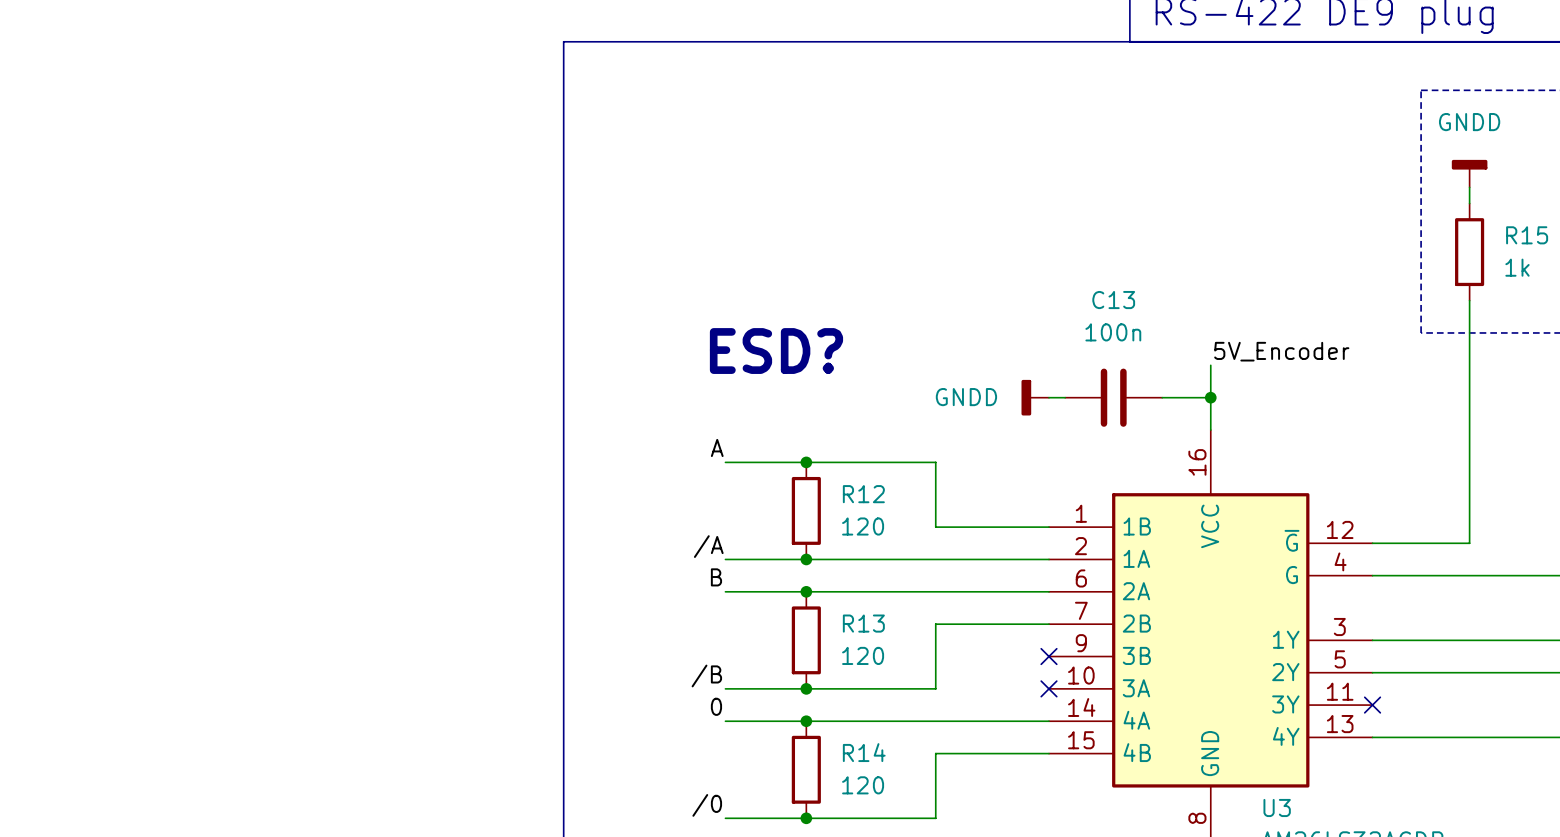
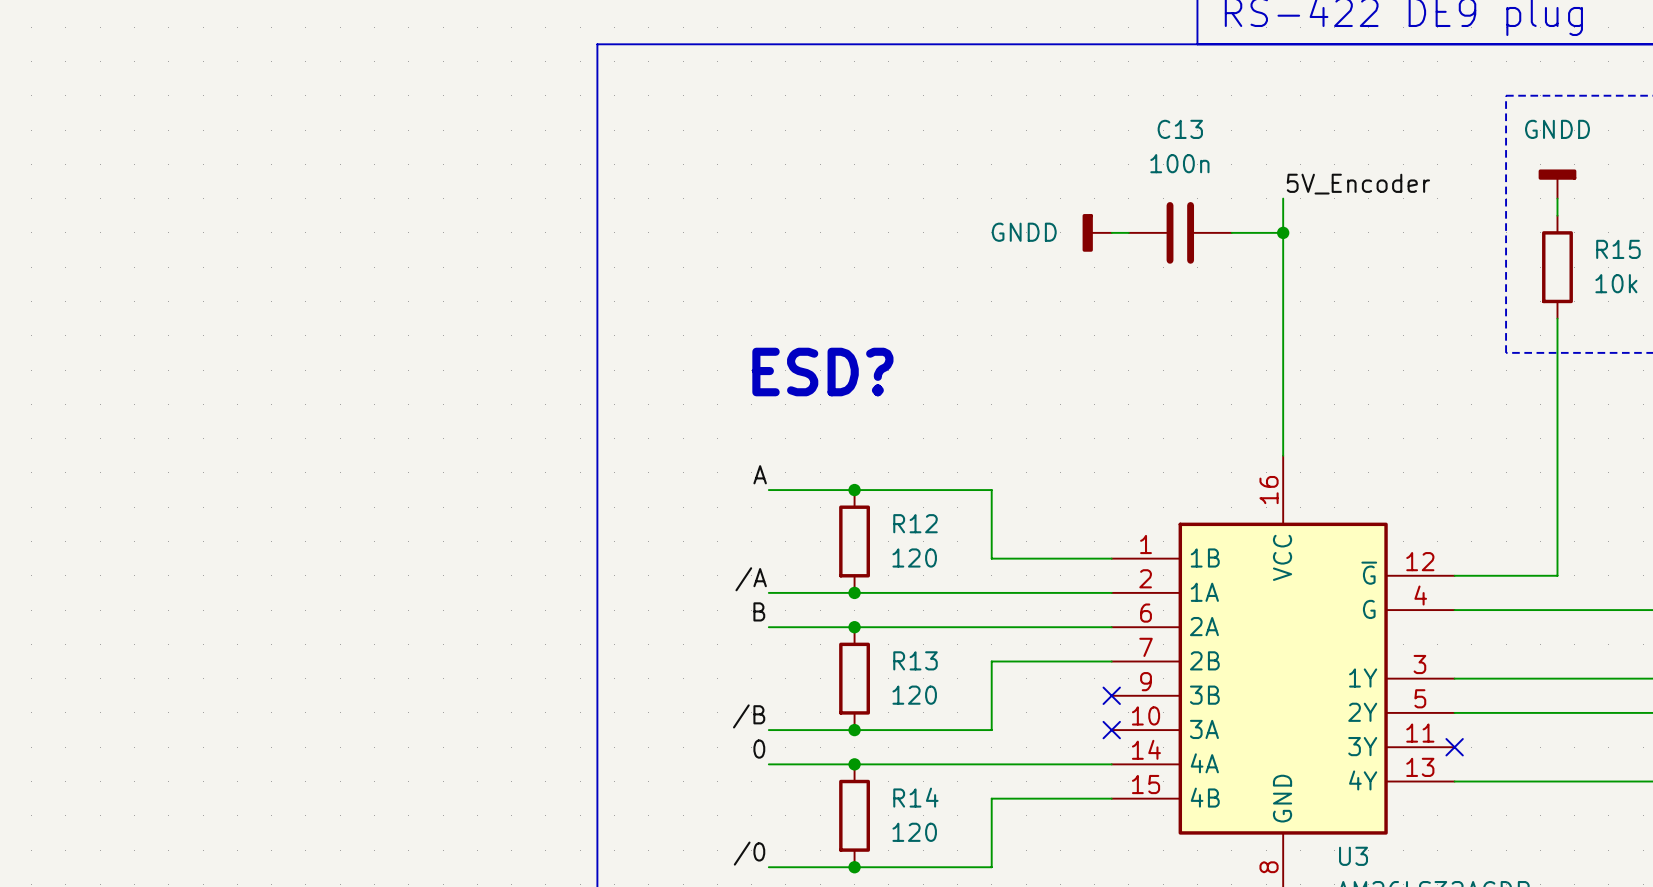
wire: none -> (1283, 198) (1283, 387)
junction: none -> (1283, 232)
R15 value: 1k (1517, 267) -> 10k (1616, 283)
label position: 5V_Encoder (1281, 351) -> 5V_Encoder (1358, 184)
power symbol position: GNDD (1035, 397) -> GNDD (1097, 232)
wire: (1048, 397) (1065, 397) -> (1111, 232) (1128, 232)
C13 position: (1113, 397) -> (1180, 232)
wire: (1162, 397) (1210, 397) -> (1231, 232) (1283, 232)
junction: (1210, 397) -> none

